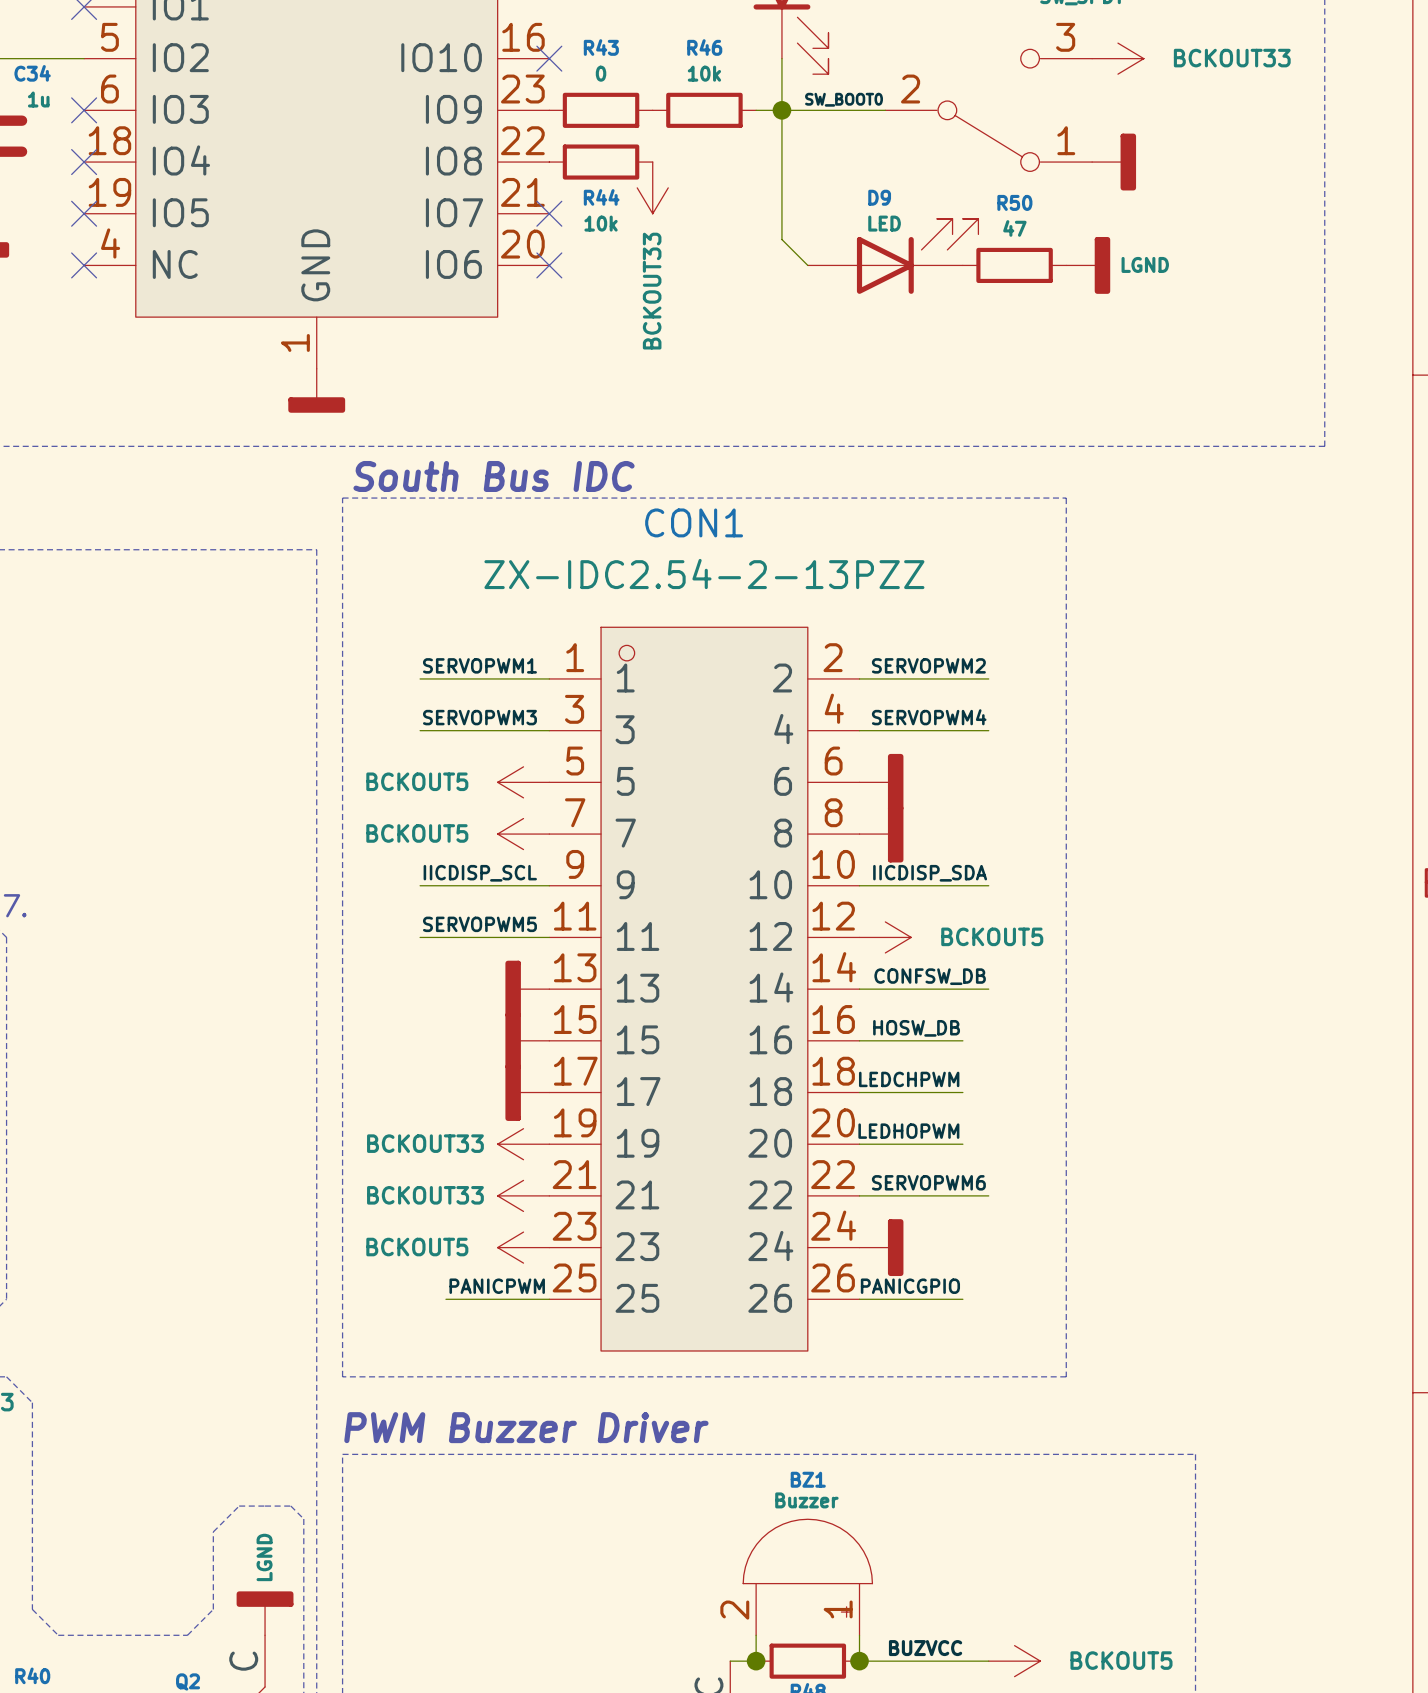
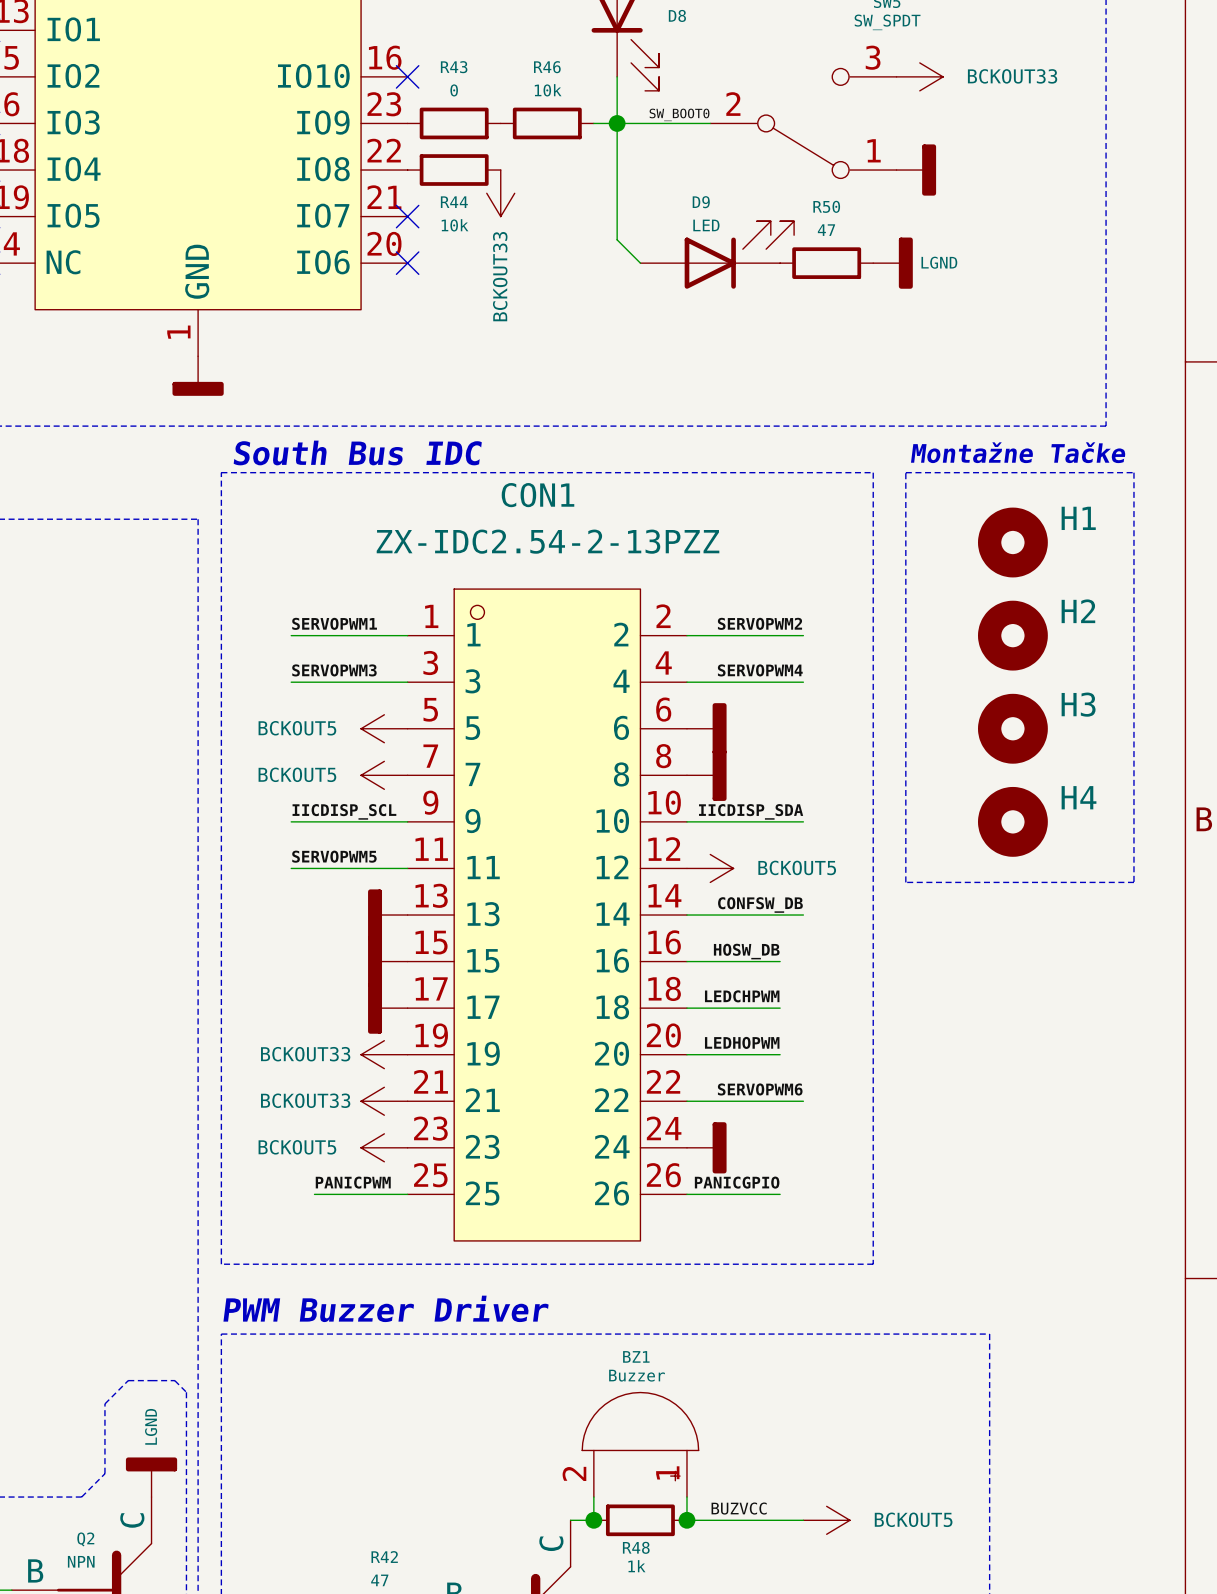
text: none -> Montažne Tačke (1018, 452)
line: none -> (905, 472) (1133, 472) (1133, 882) (905, 882) (905, 472)
H1: none -> (1012, 542)
H2: none -> (1012, 635)
H3: none -> (1012, 728)
H4: none -> (1012, 821)

